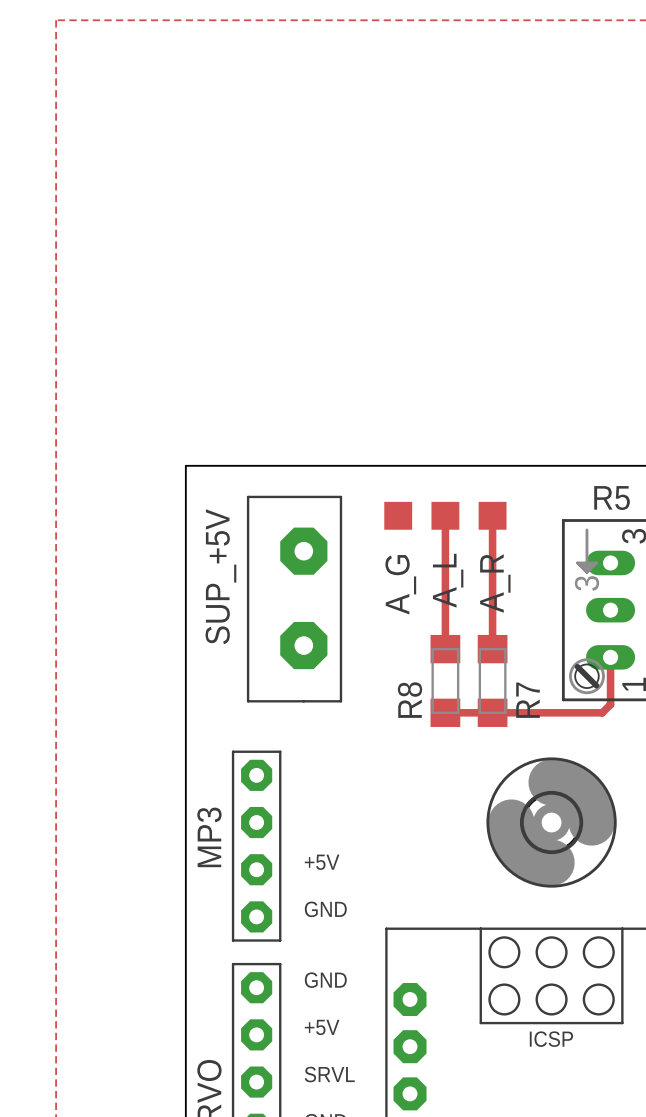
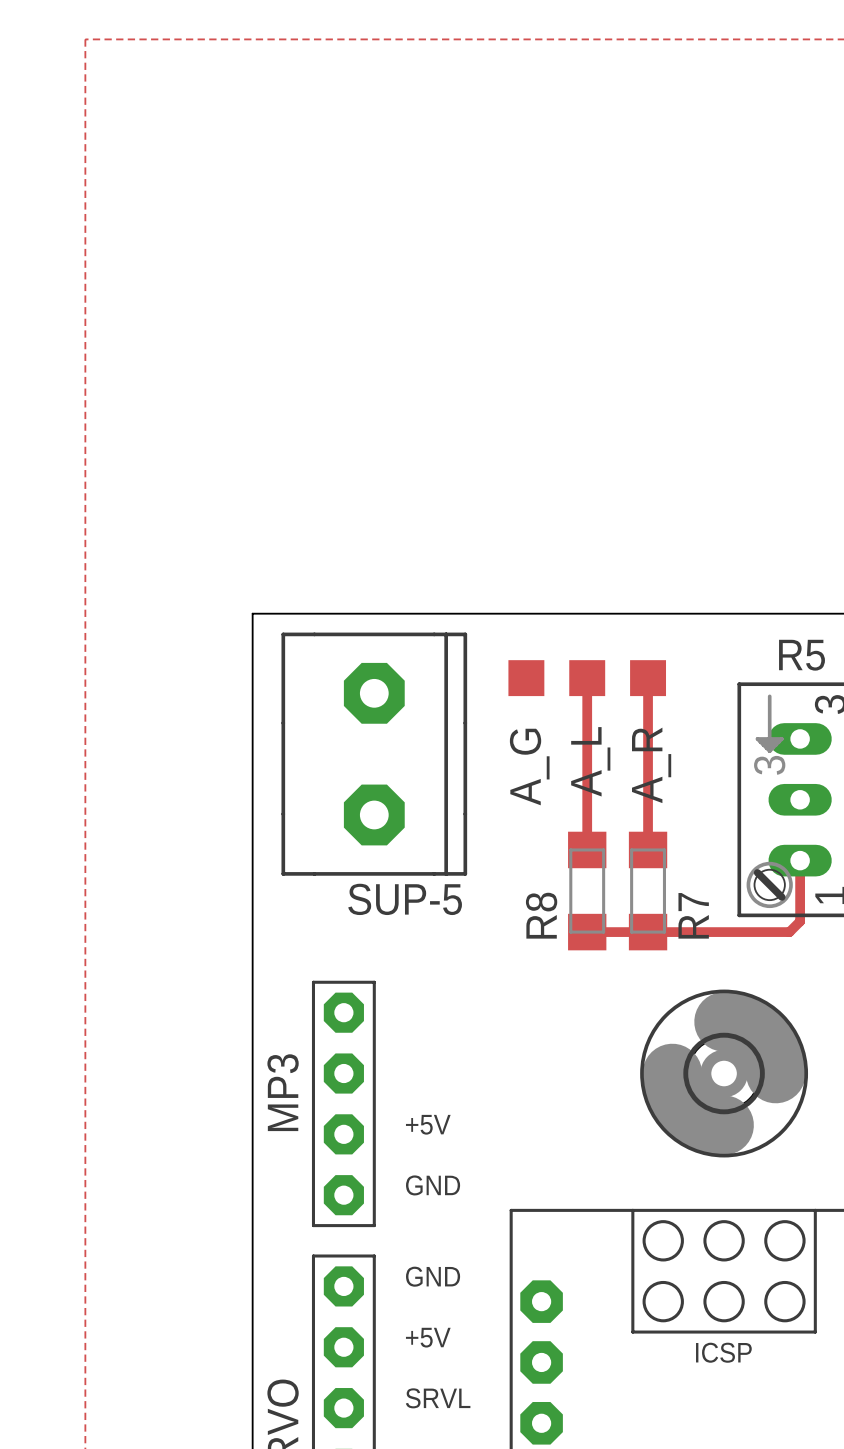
SUP-5: none -> (374, 754)
SUP_+5V: (294, 599) -> none

